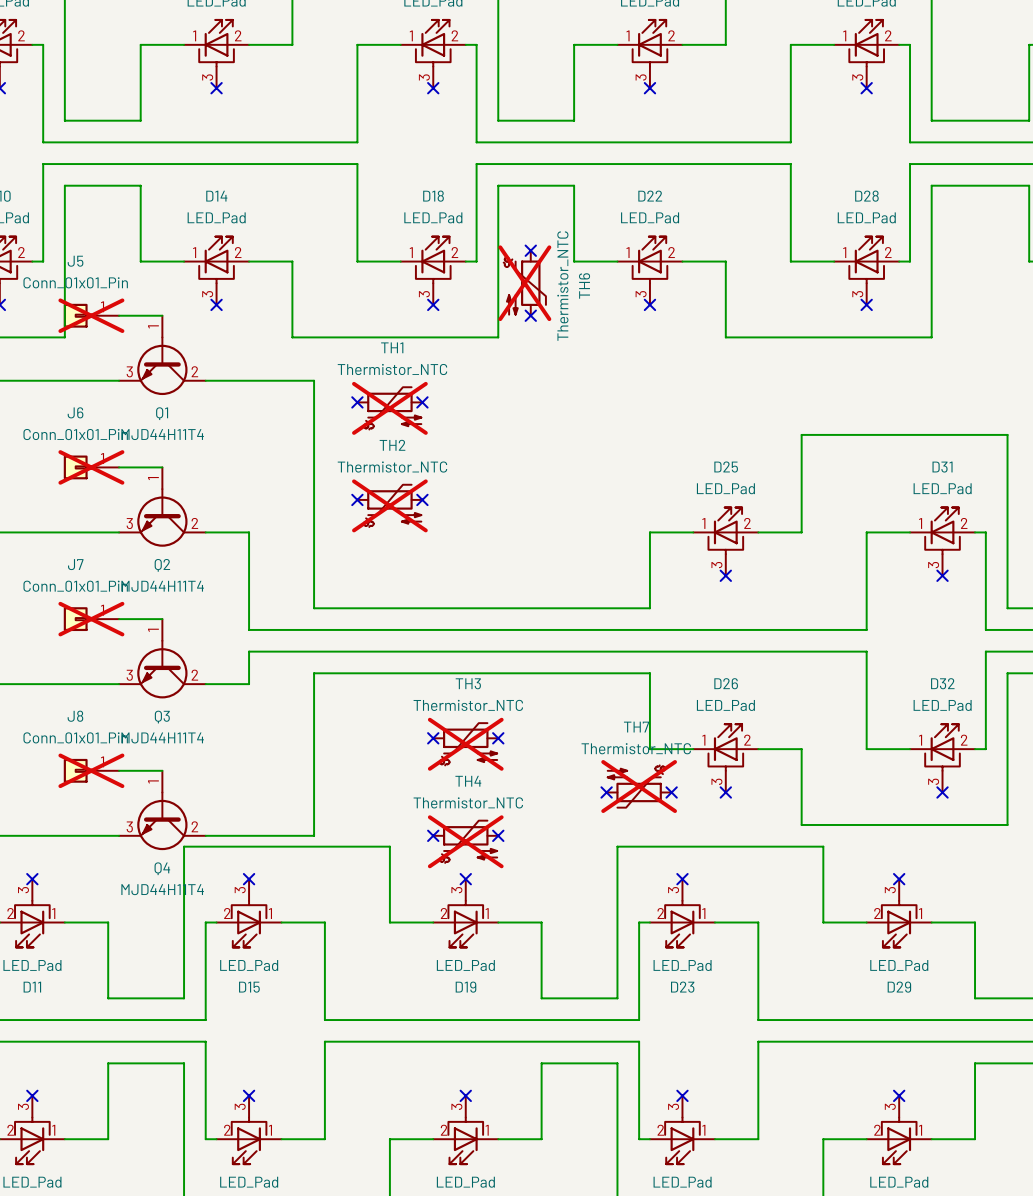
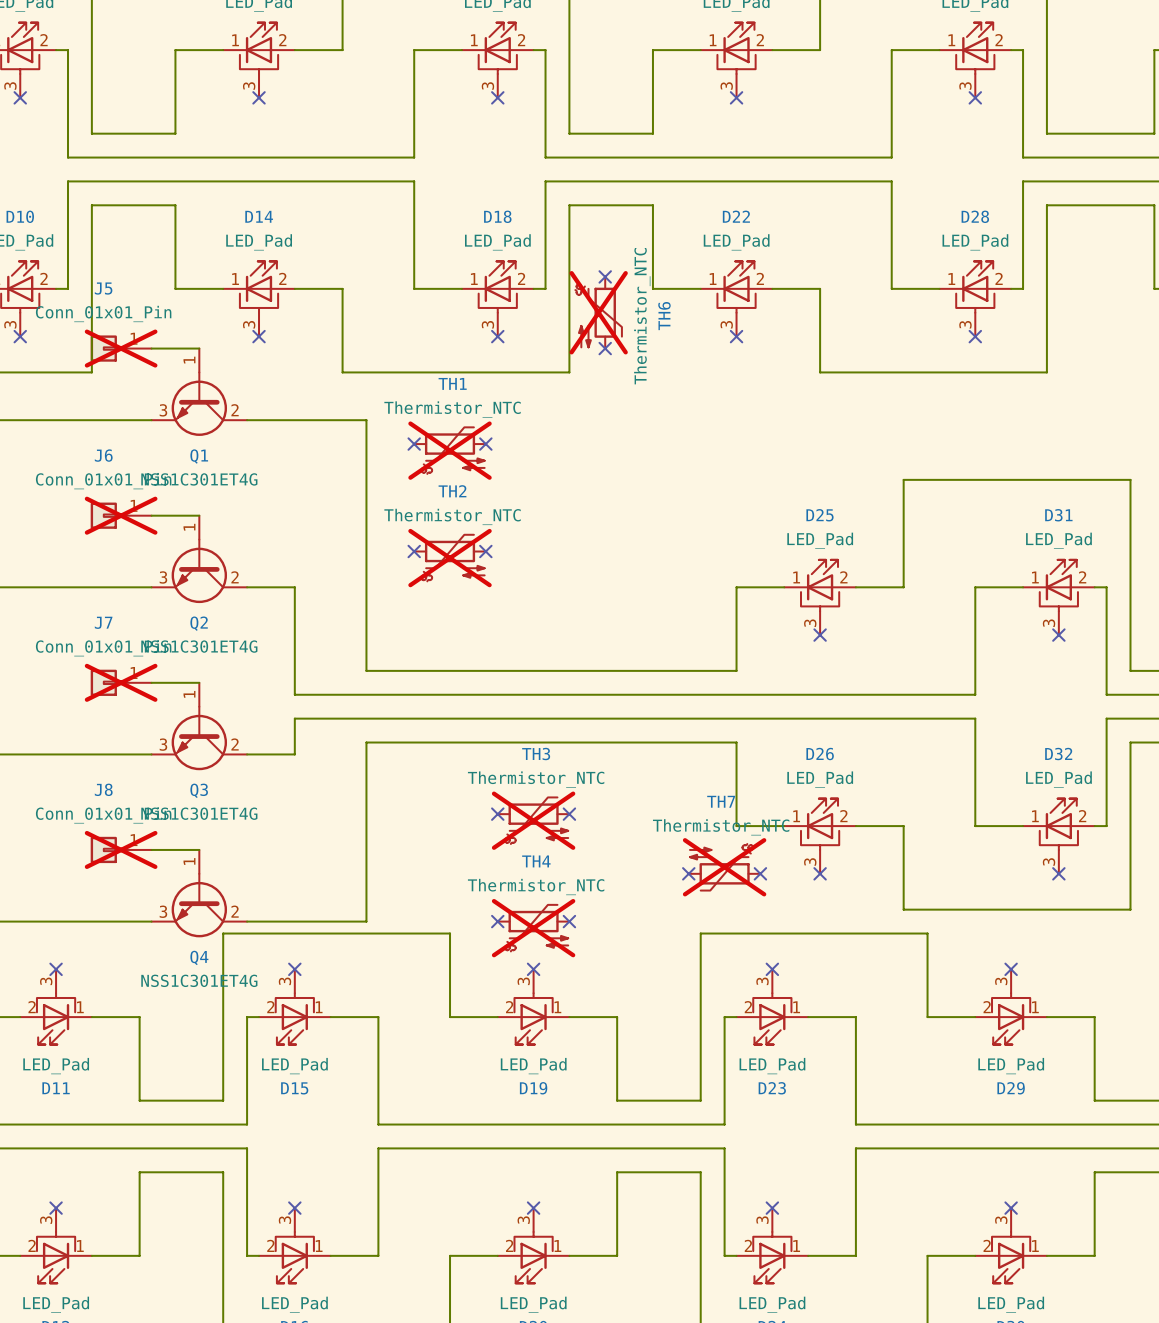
Q1 value: MJD44H11T4 (162, 434) -> NSS1C301ET4G (199, 479)
Q2 value: MJD44H11T4 (162, 586) -> NSS1C301ET4G (199, 646)
Q3 value: MJD44H11T4 (162, 737) -> NSS1C301ET4G (199, 813)
Q4 value: MJD44H11T4 (162, 889) -> NSS1C301ET4G (199, 980)

